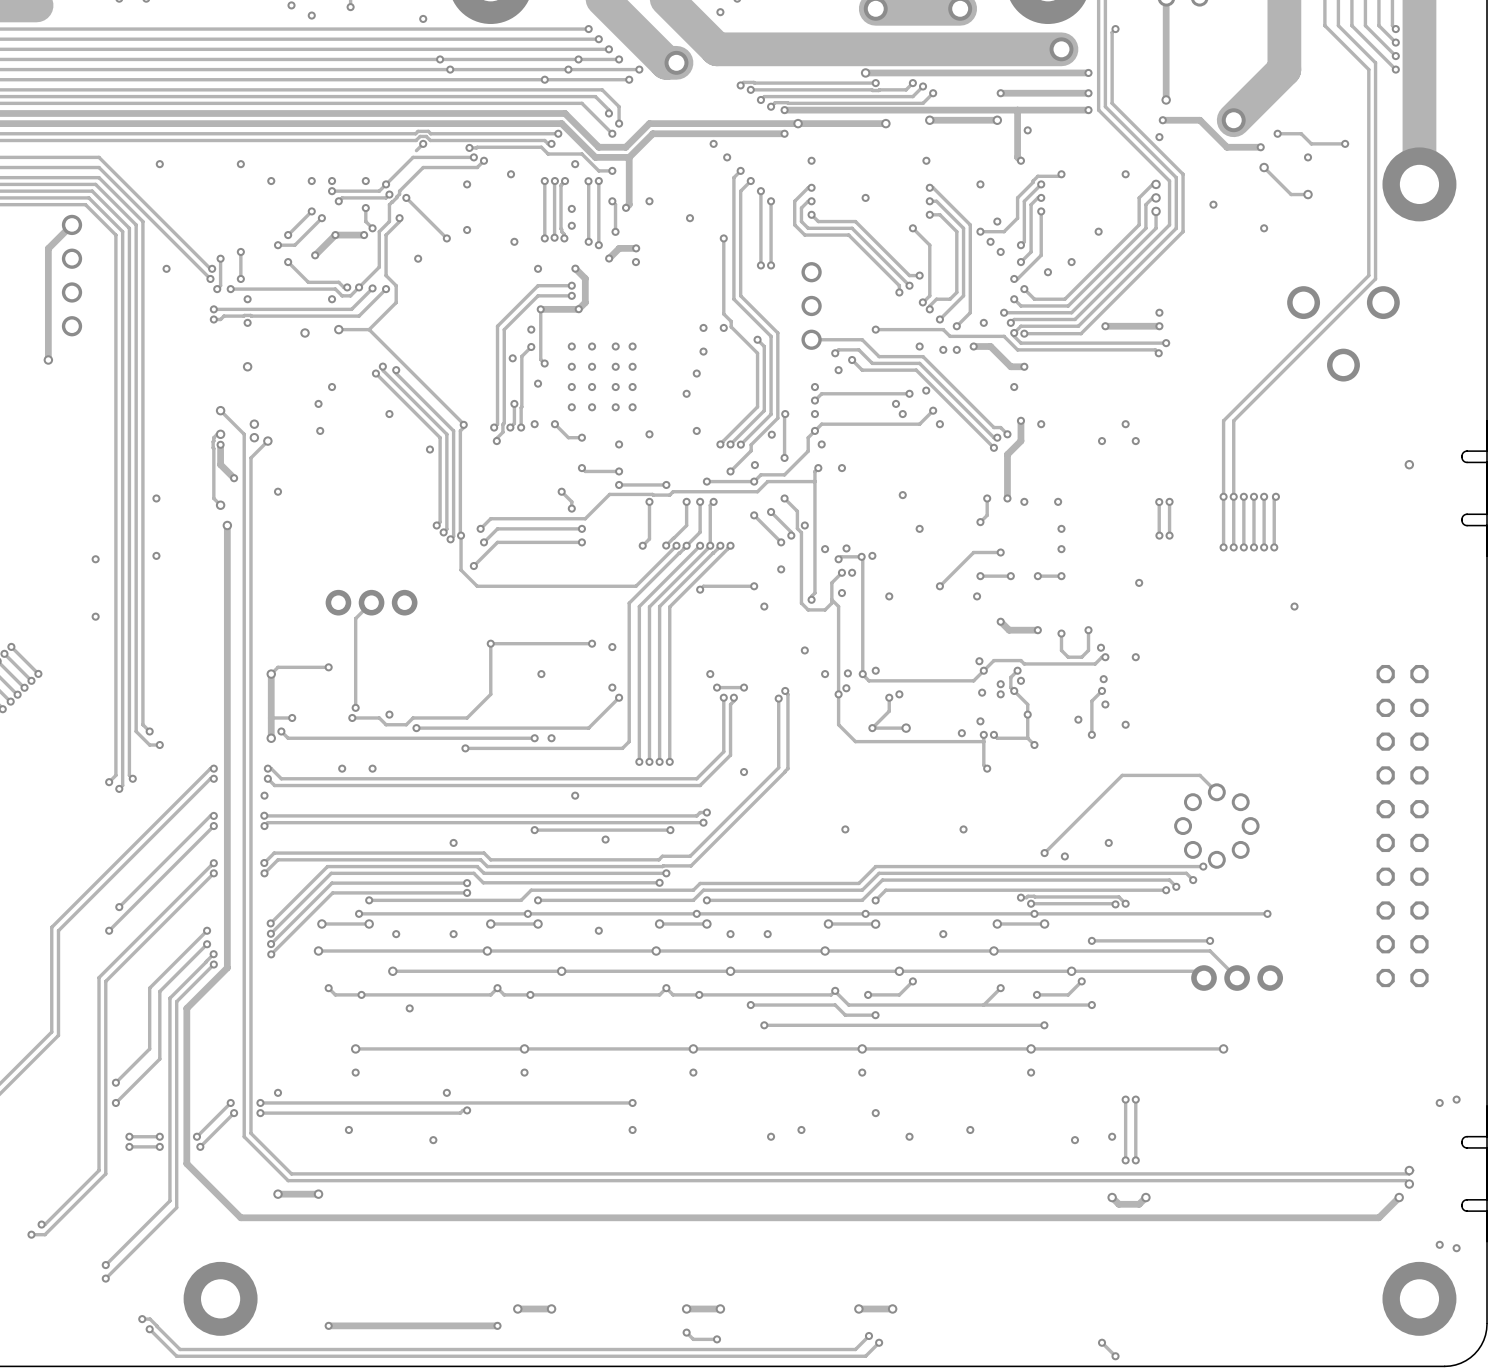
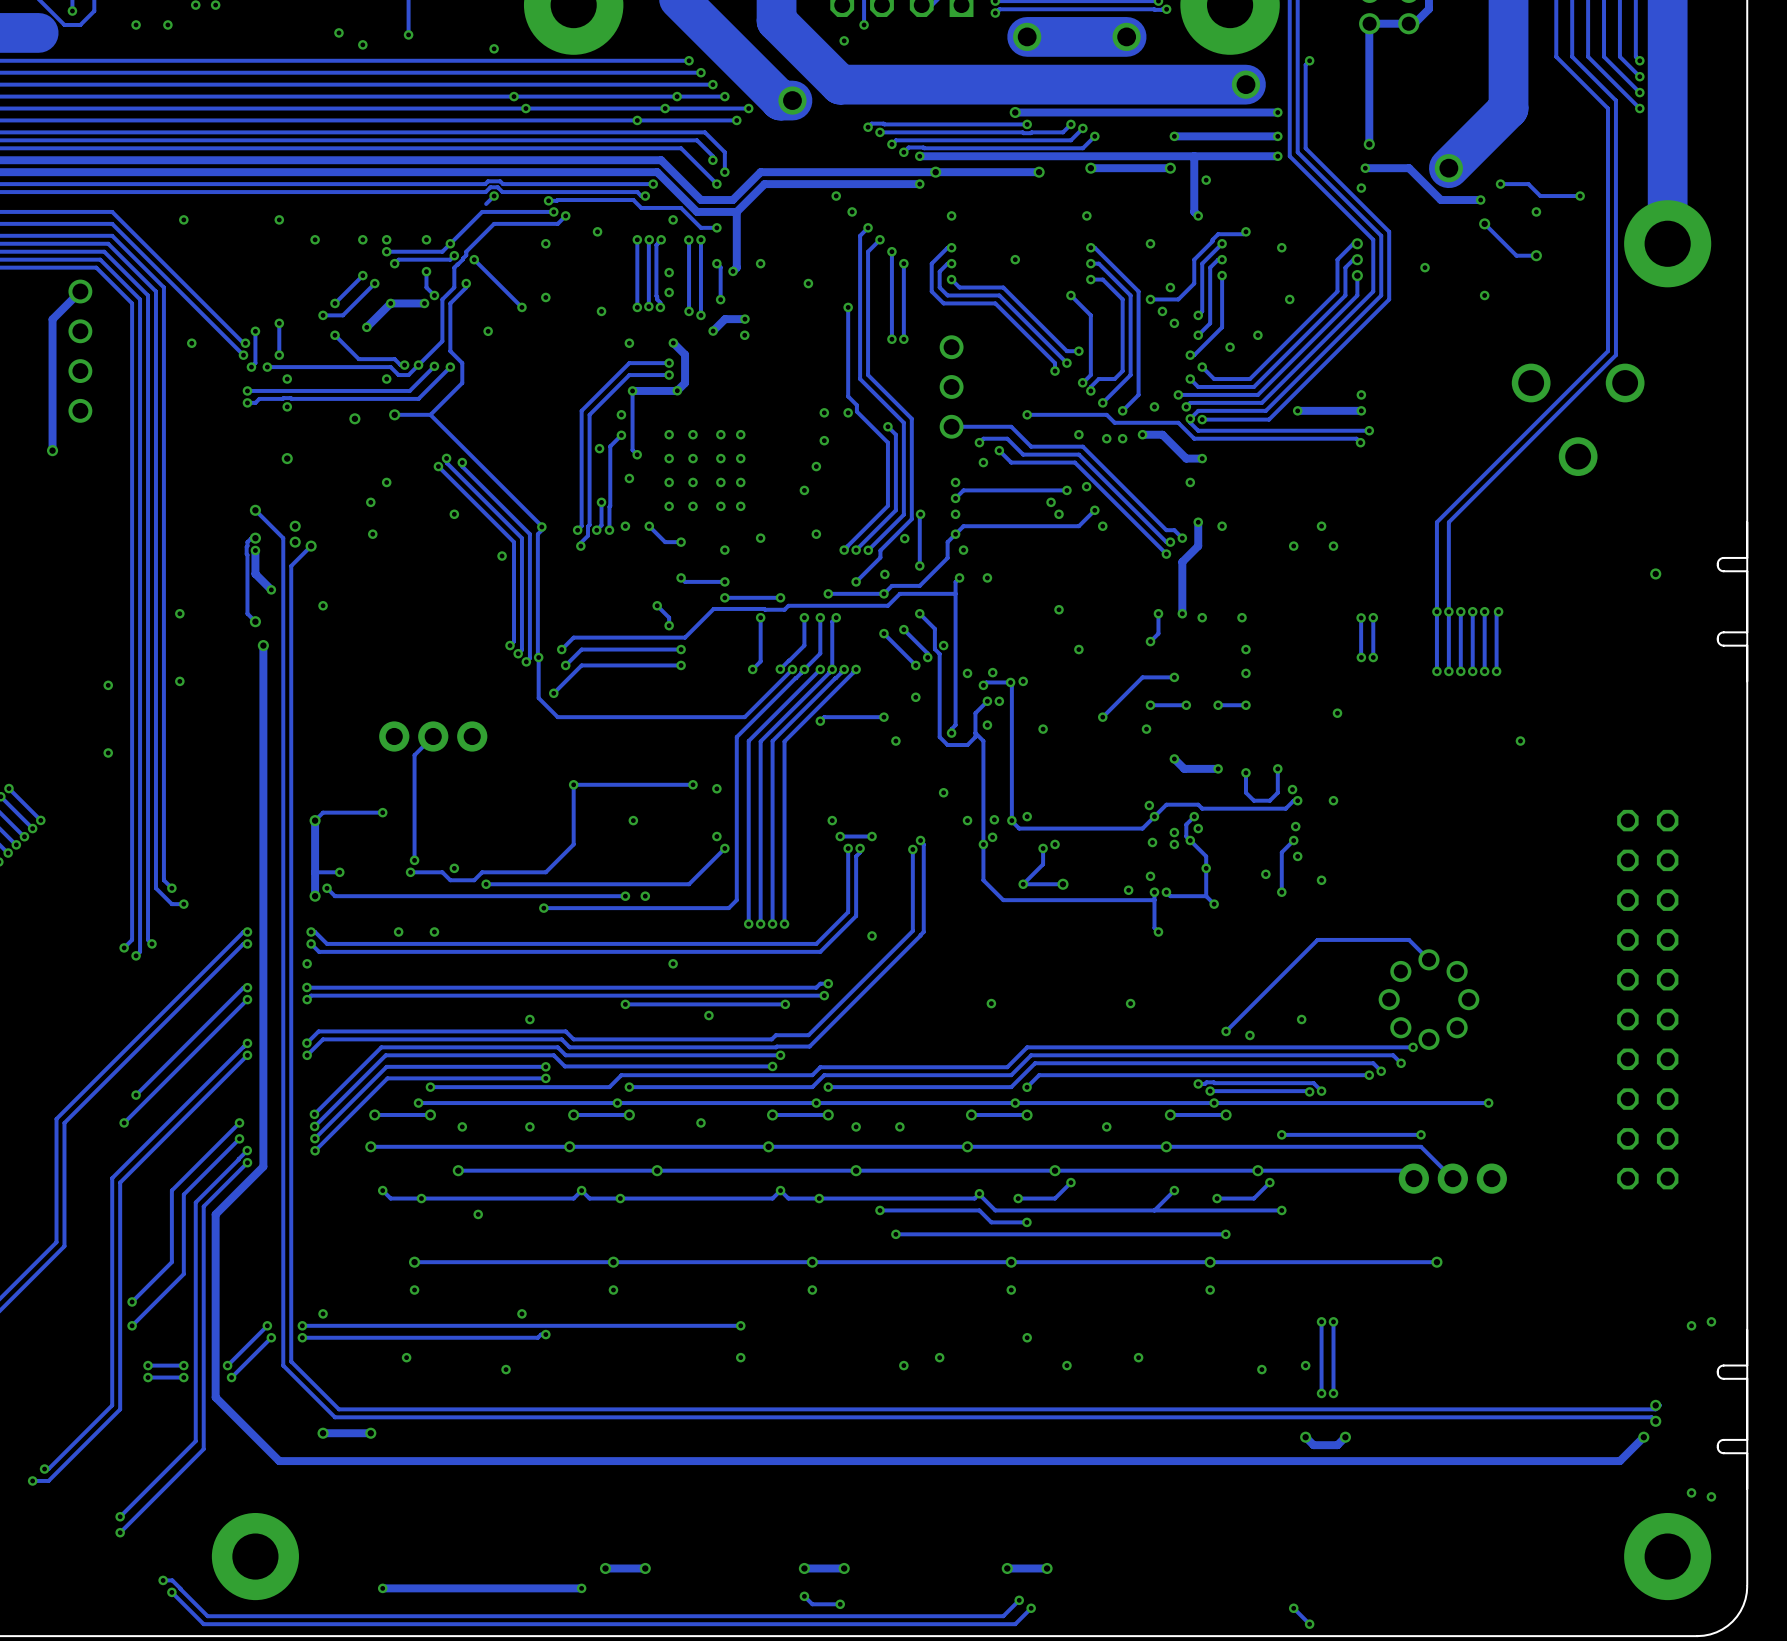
via position: (1125, 174) -> (1281, 247)

